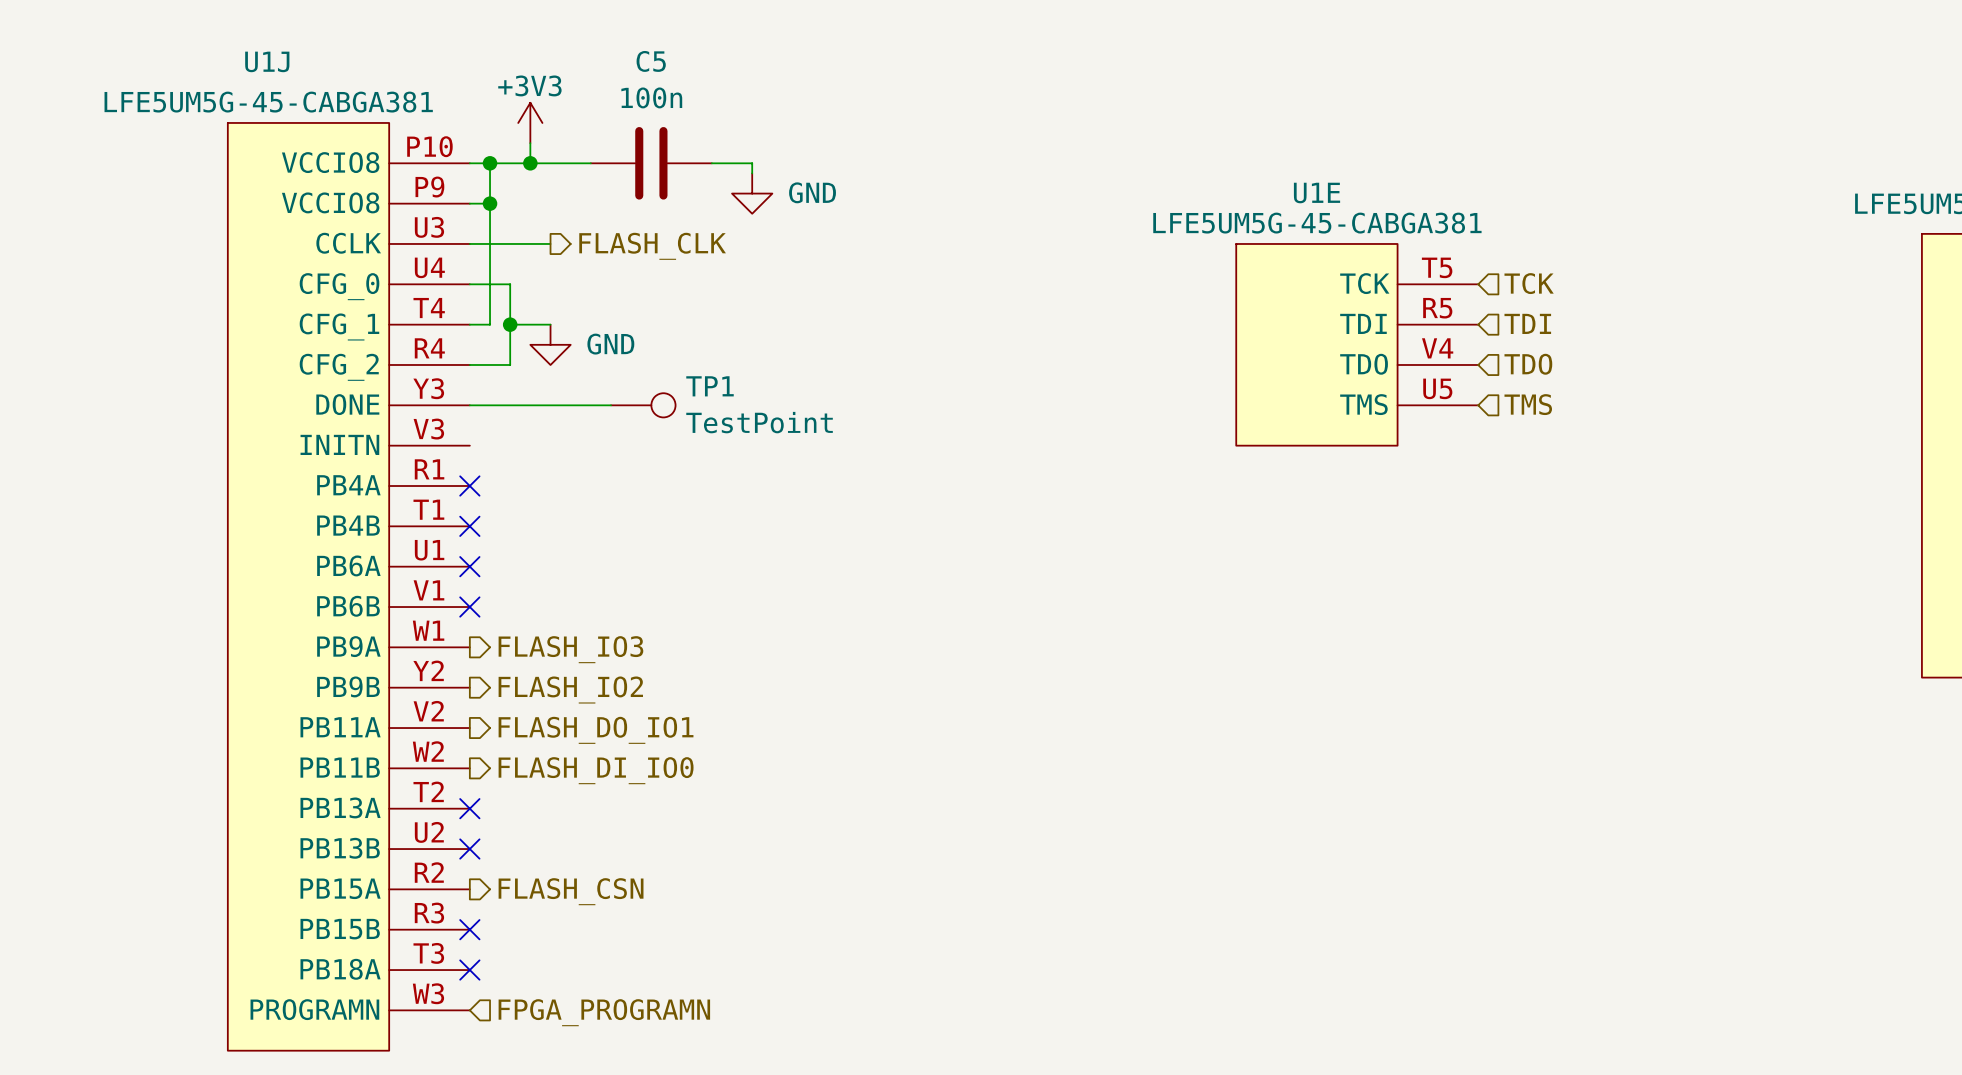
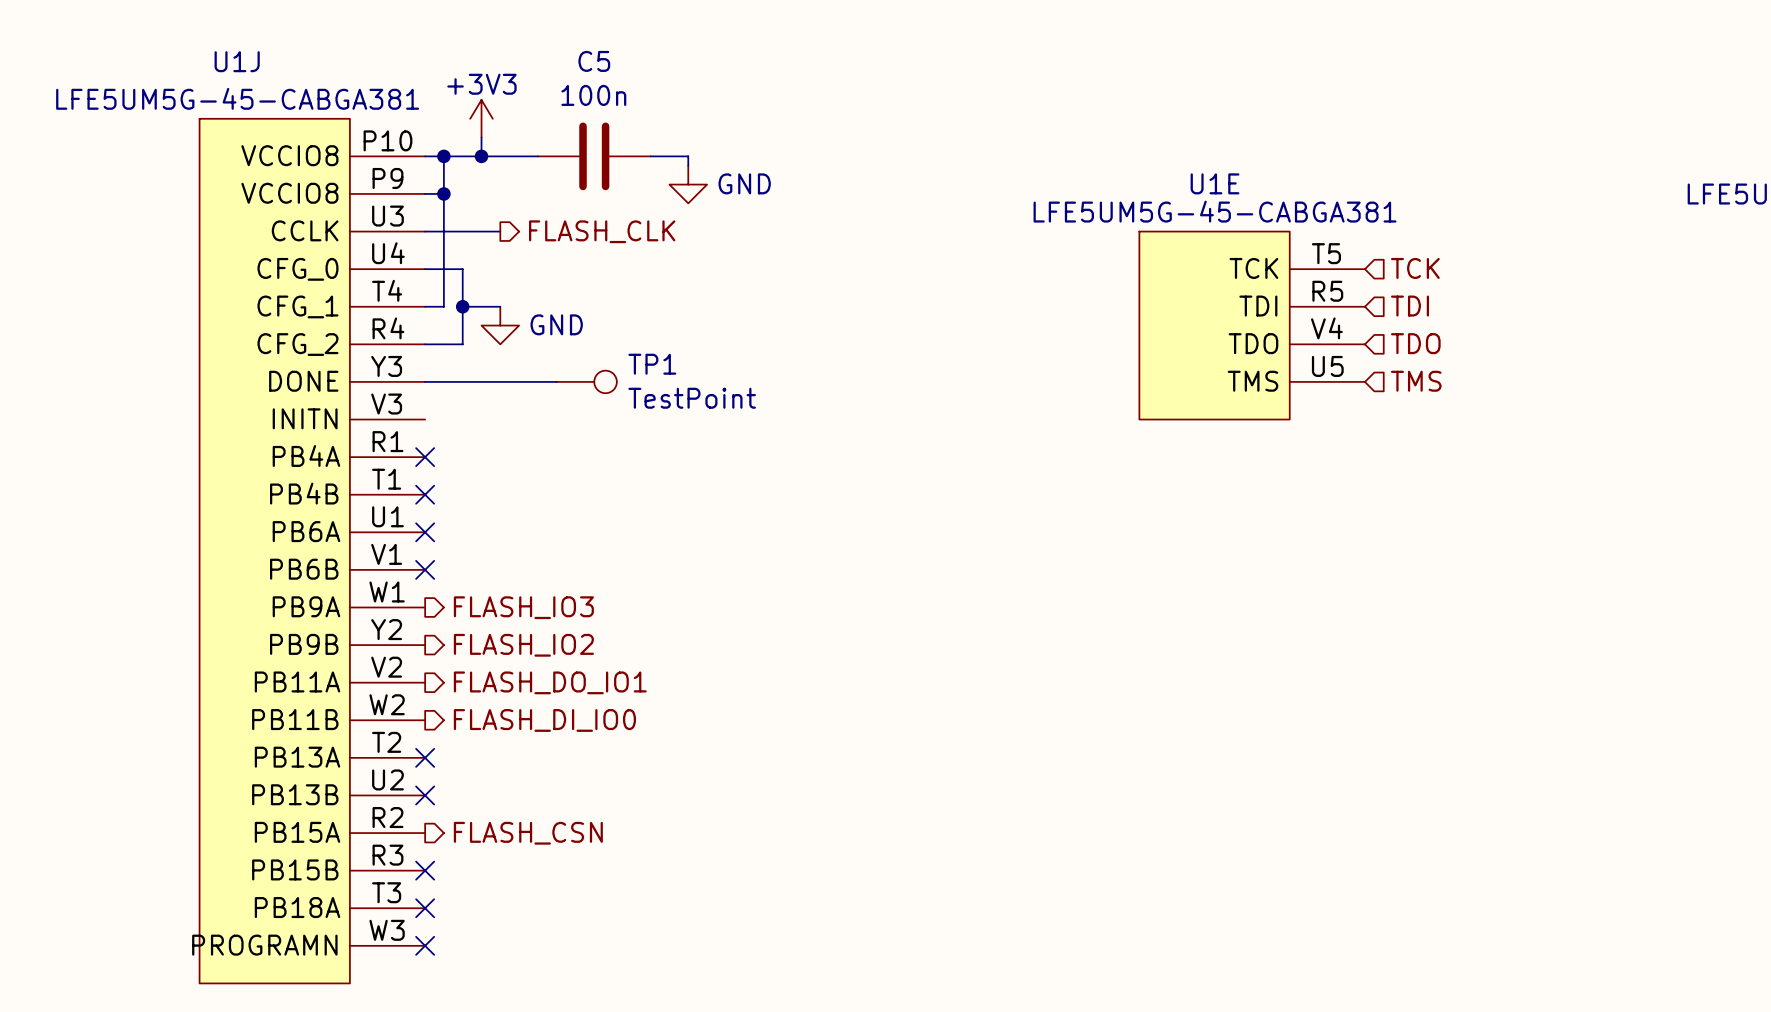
no-connect mark: none -> (425, 945)
hierarchical label: FPGA_PROGRAMN (604, 1012) -> none

